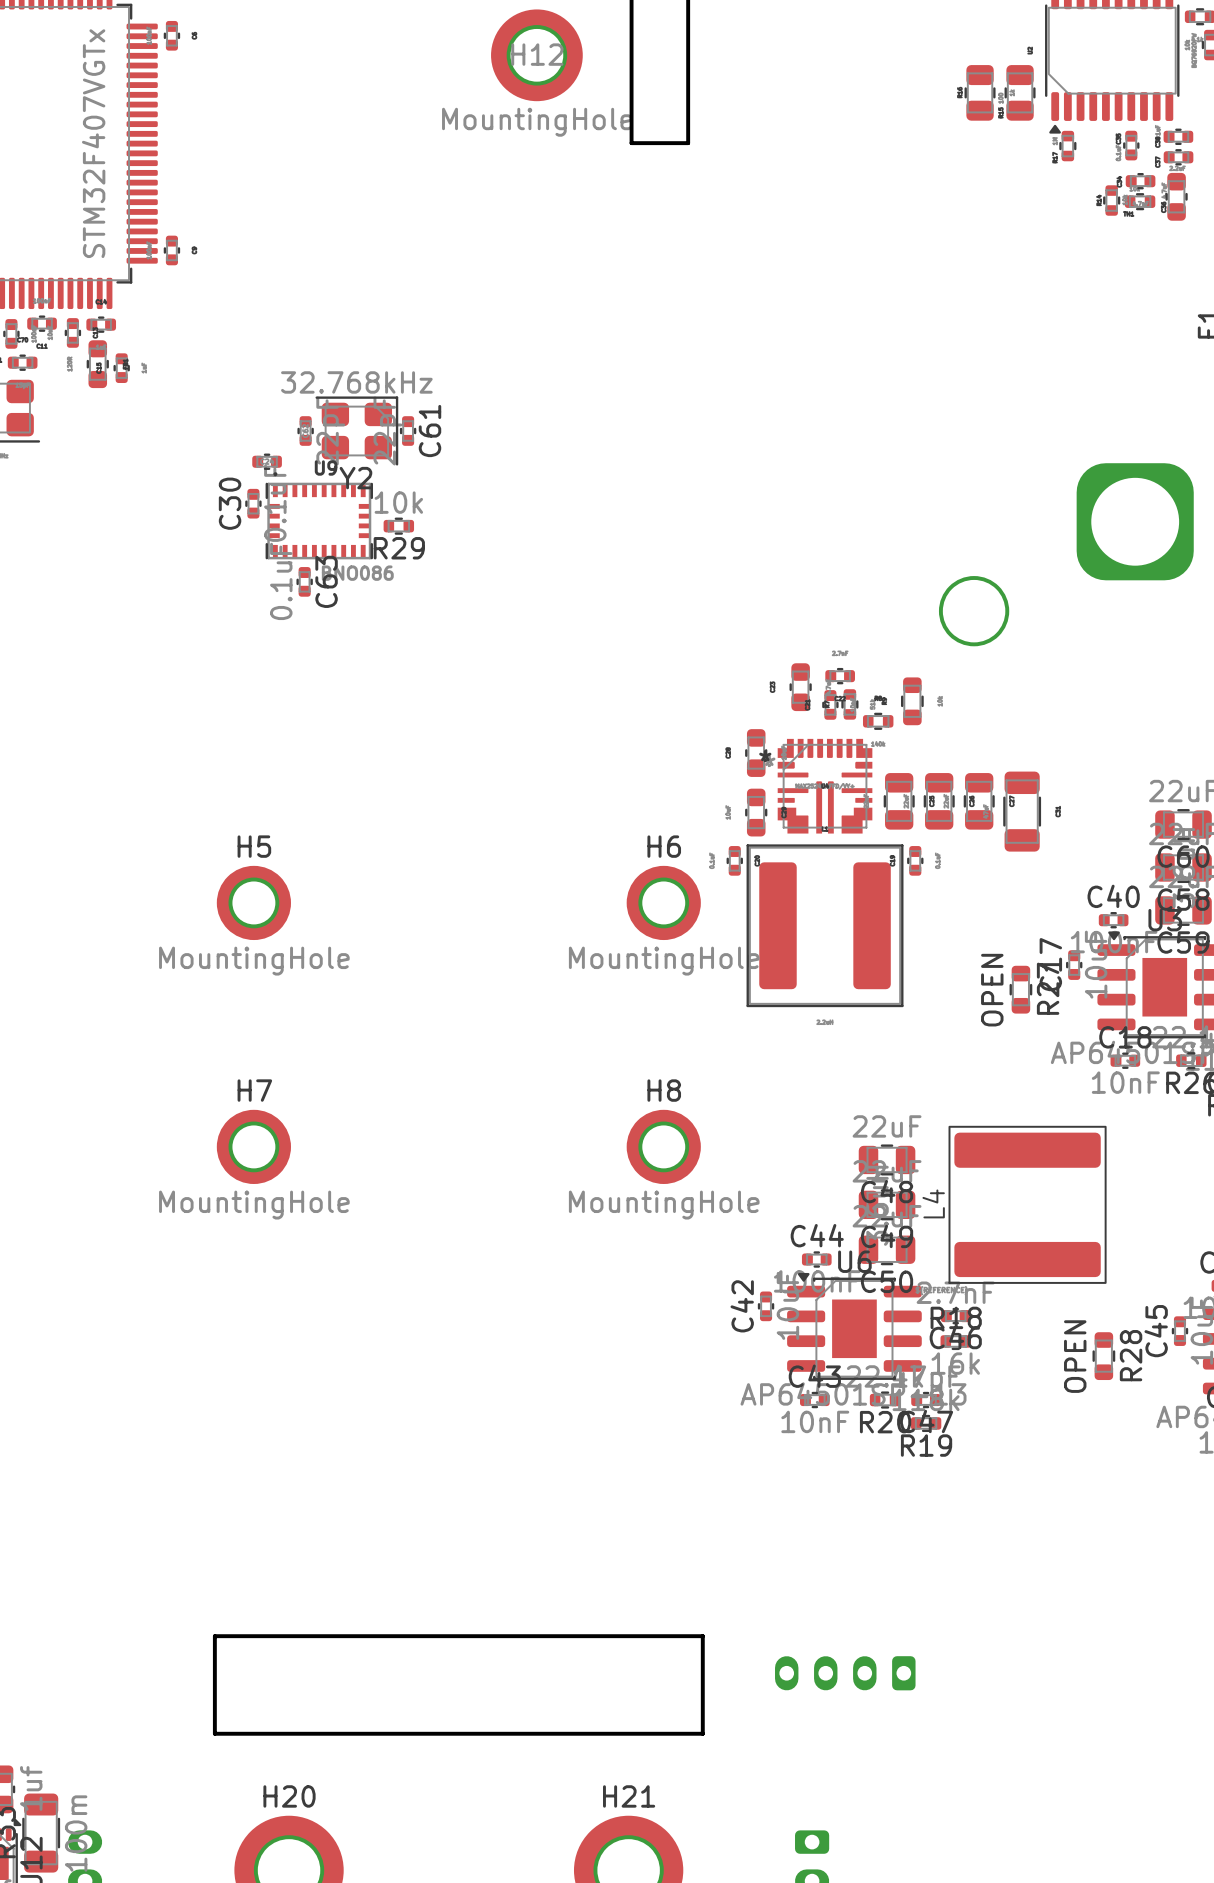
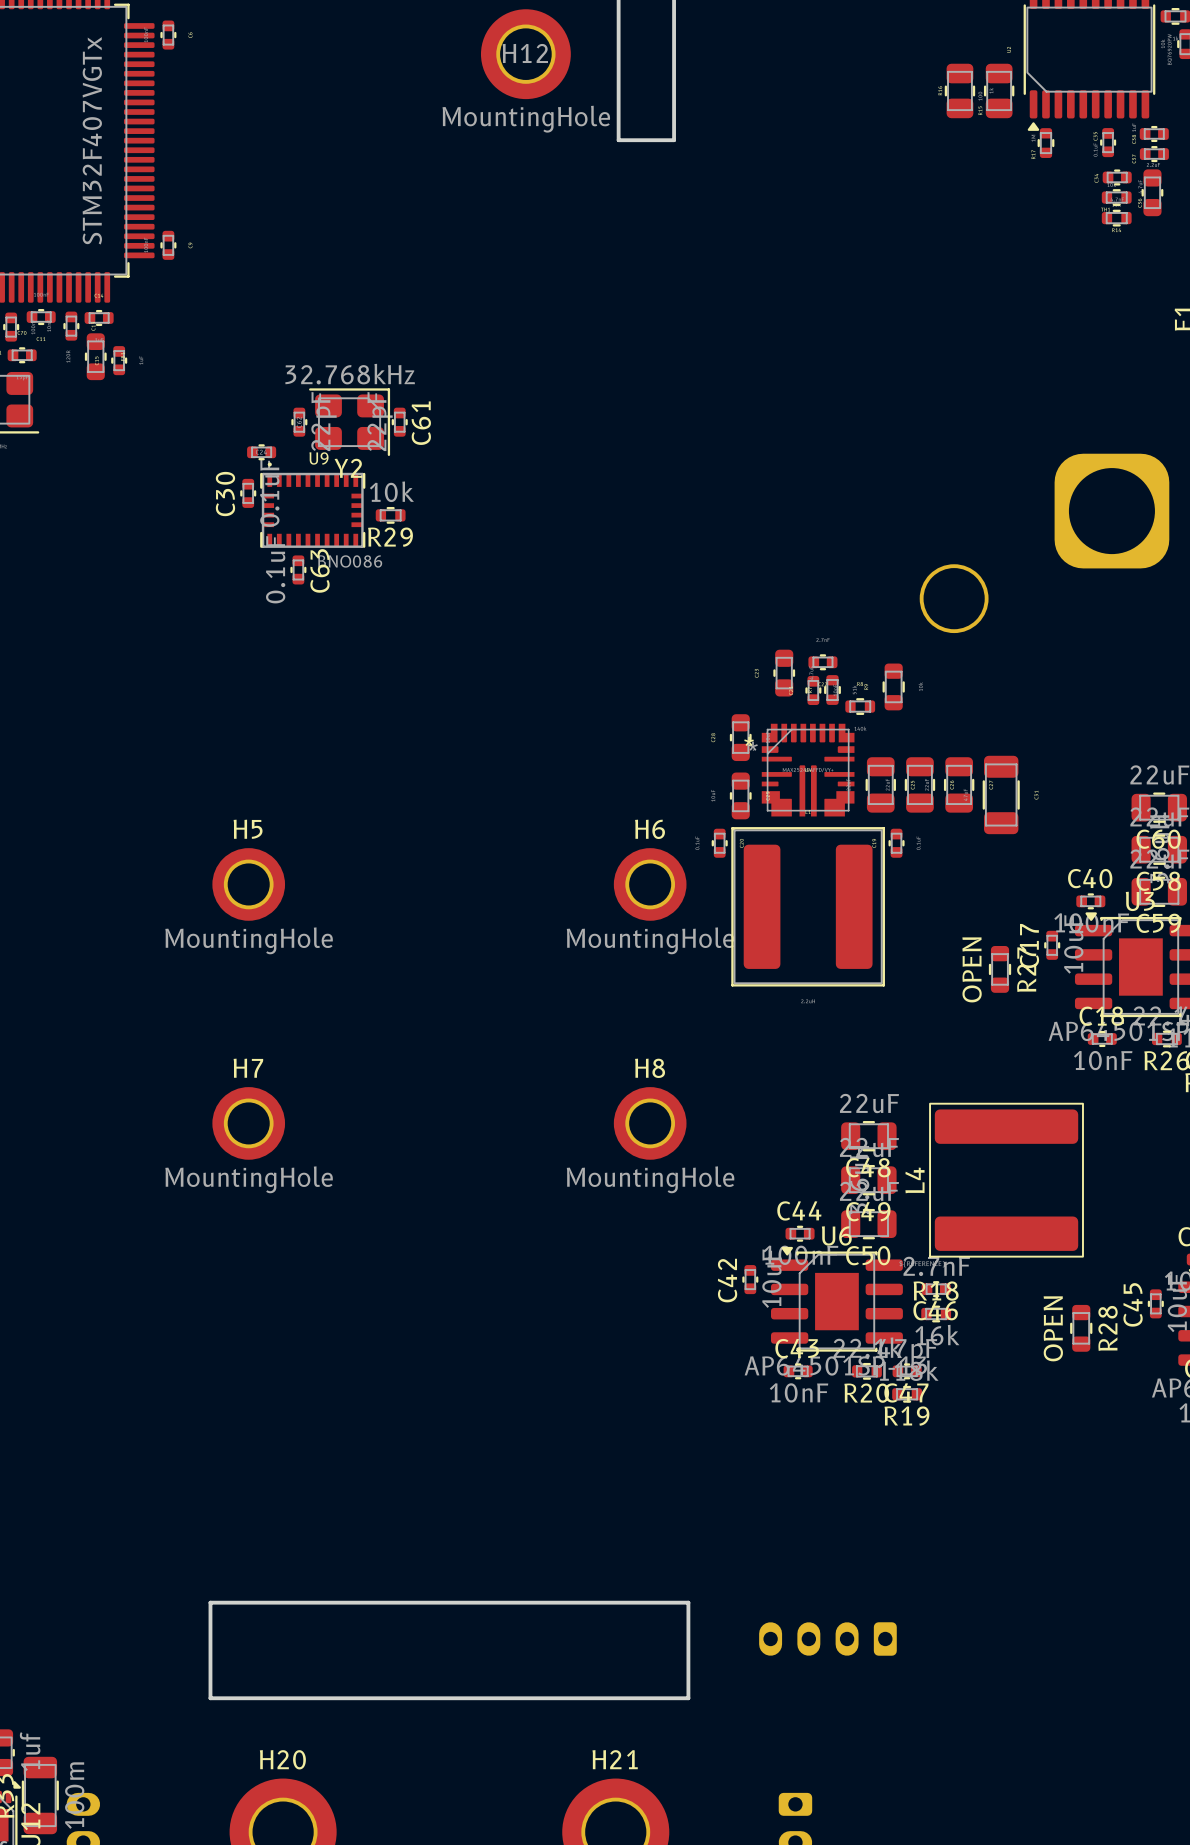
part rotation: 0° (1111, 200) -> 90° clockwise (1116, 218)
part position: (1111, 200) -> (1116, 218)

